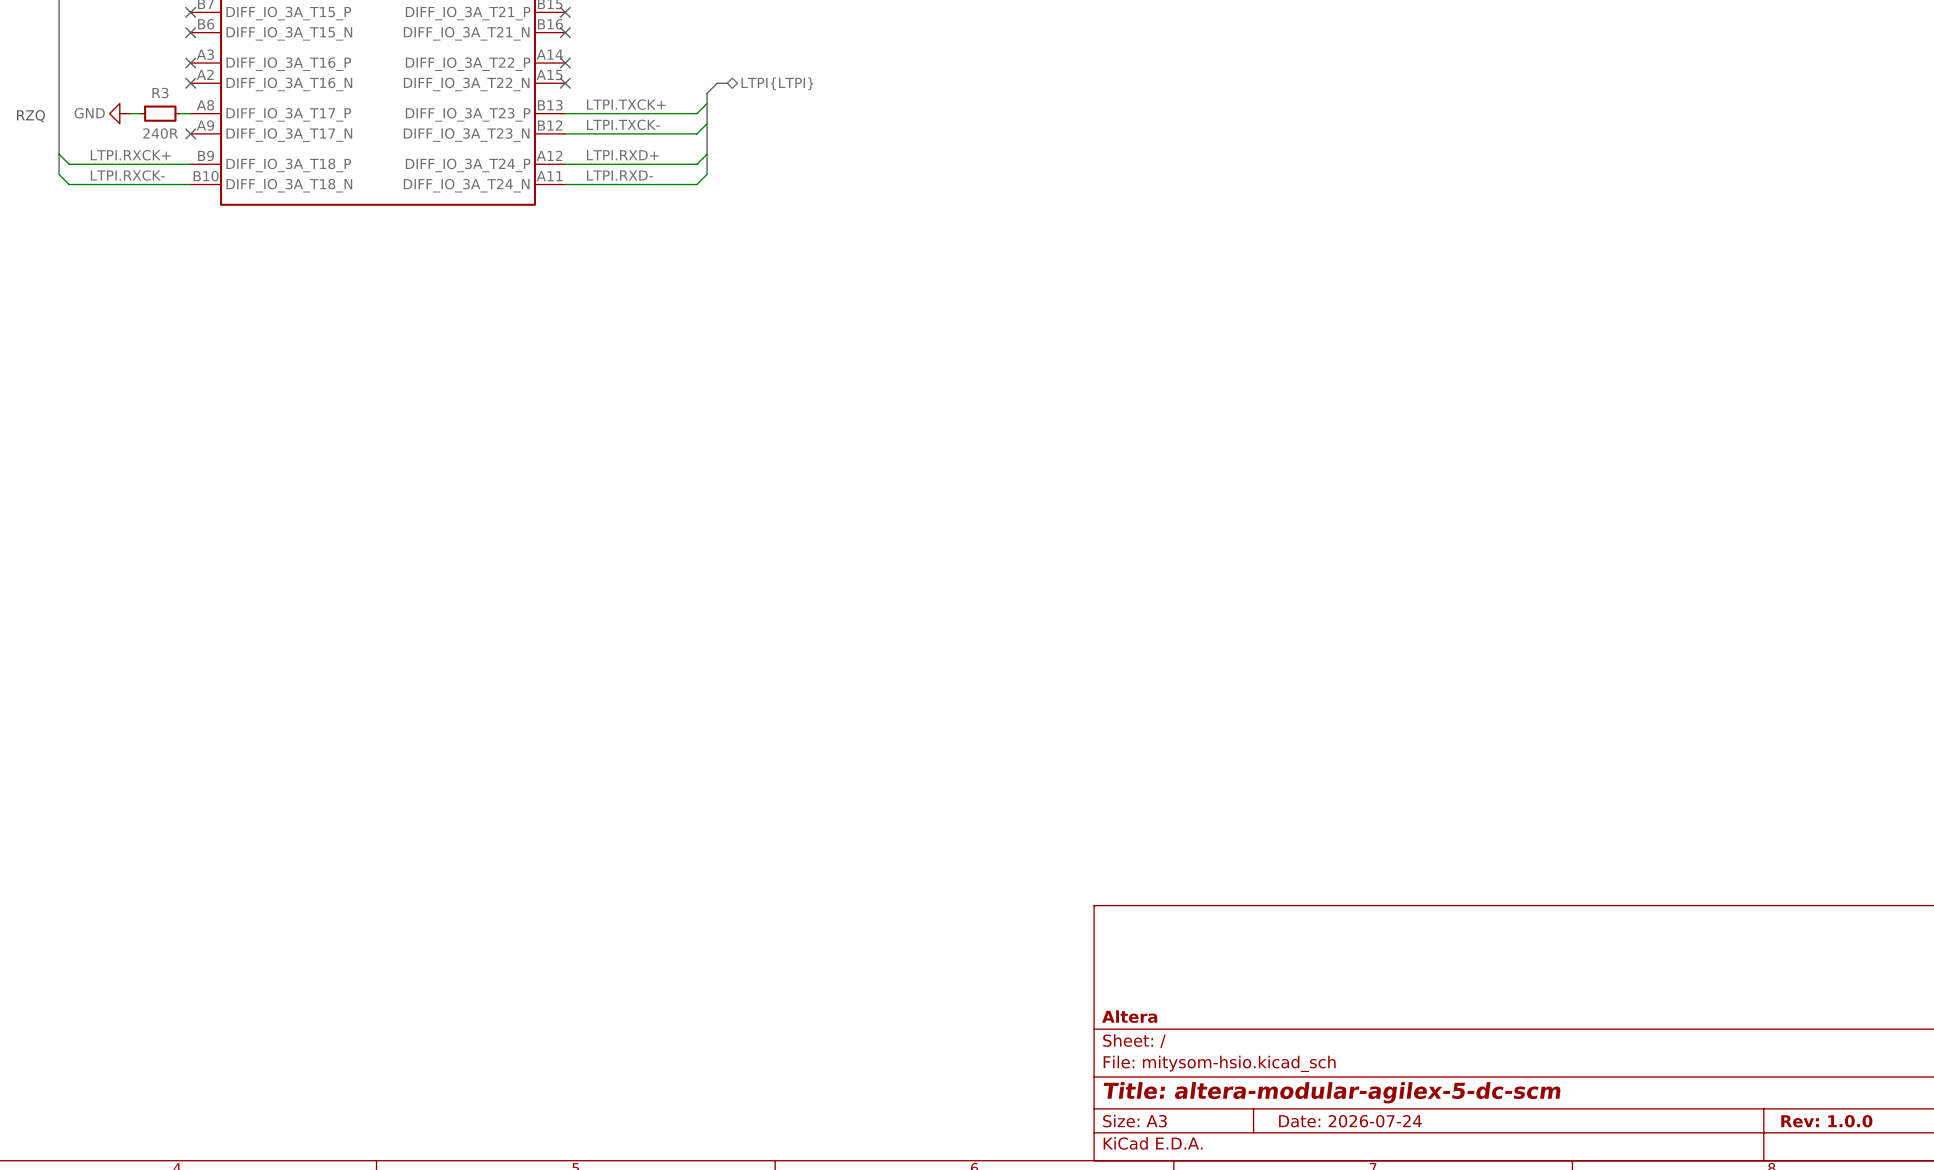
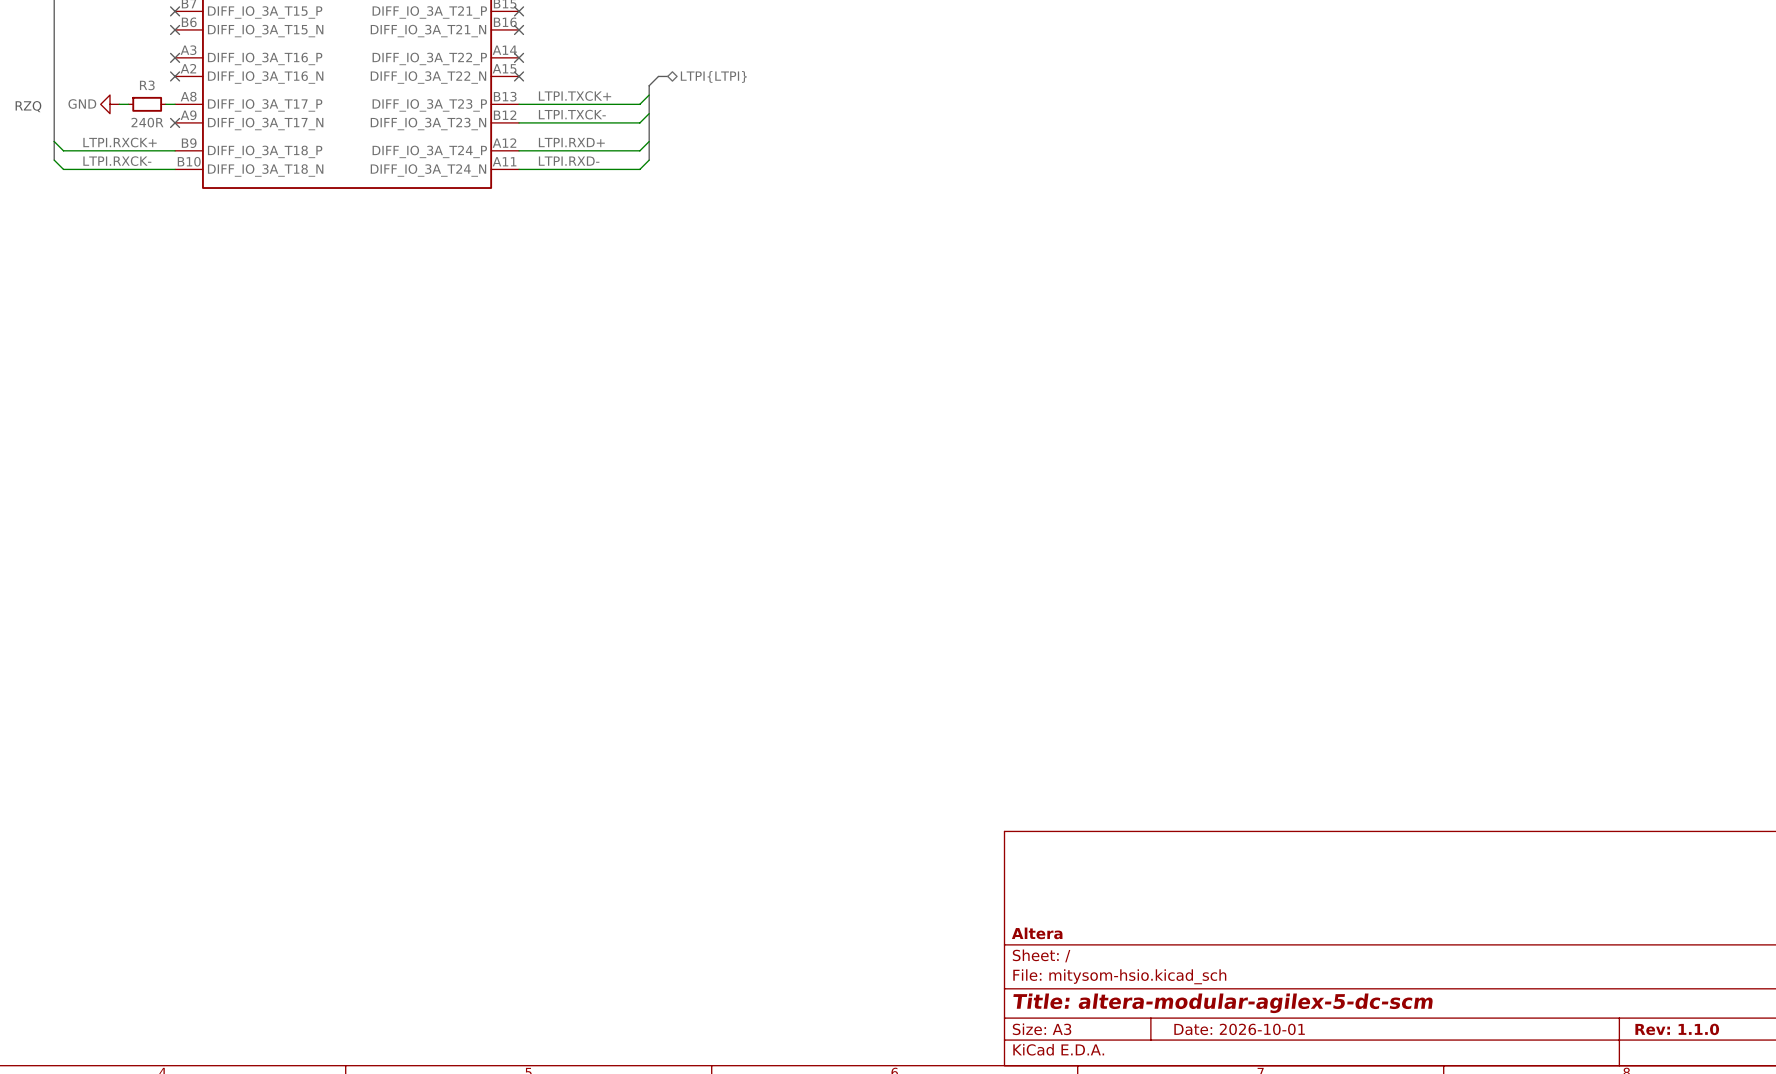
title block: Date: 2026-07-24 (1350, 1121) -> Date: 2026-10-01 (1239, 1029)
title block: Rev: 1.0.0 (1826, 1121) -> Rev: 1.1.0 (1677, 1029)

